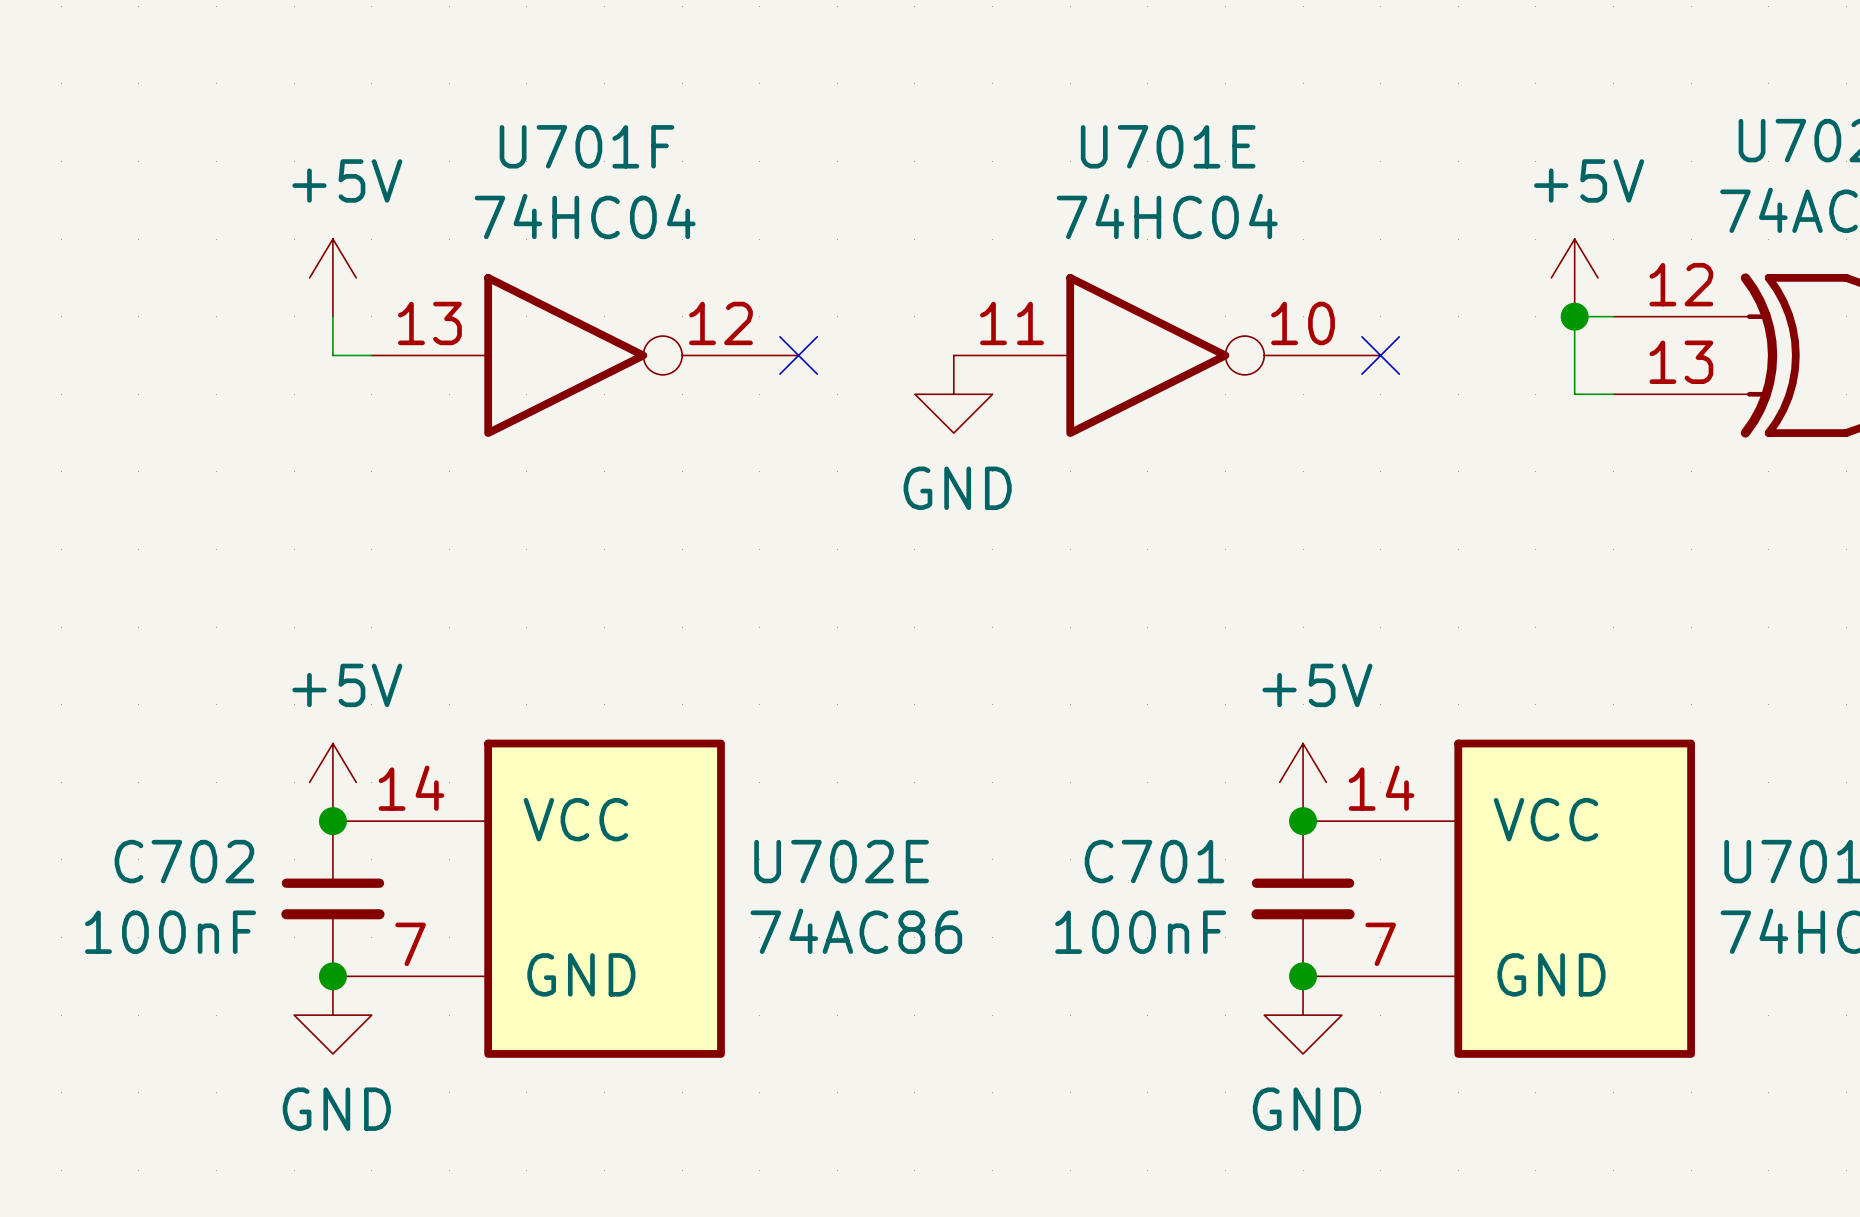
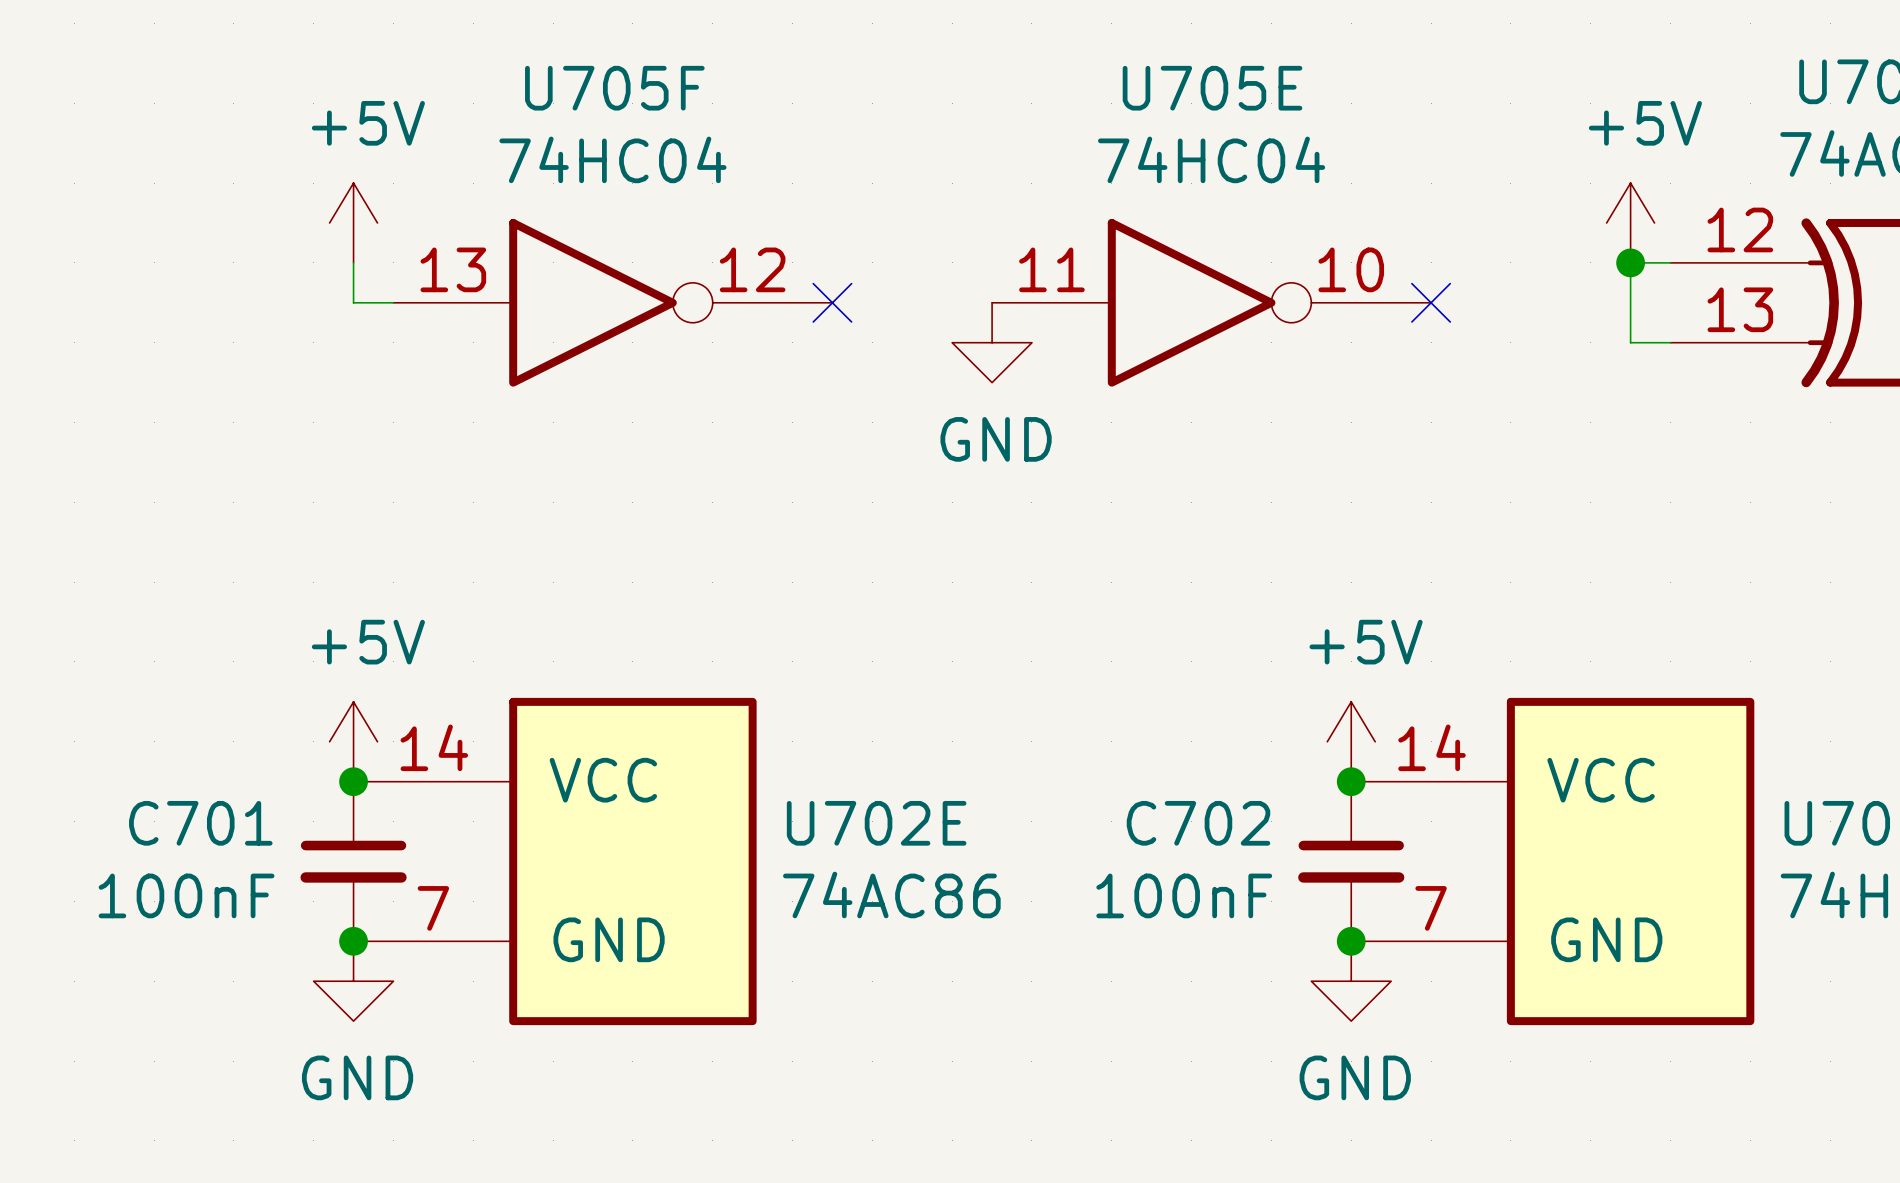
U701F name: U701F (587, 146) -> U705F (614, 88)
U701E name: U701E (1168, 146) -> U705E (1212, 88)
C702 name: C702 (184, 861) -> C701 (200, 823)
C701 name: C701 (1154, 861) -> C702 (1198, 823)

